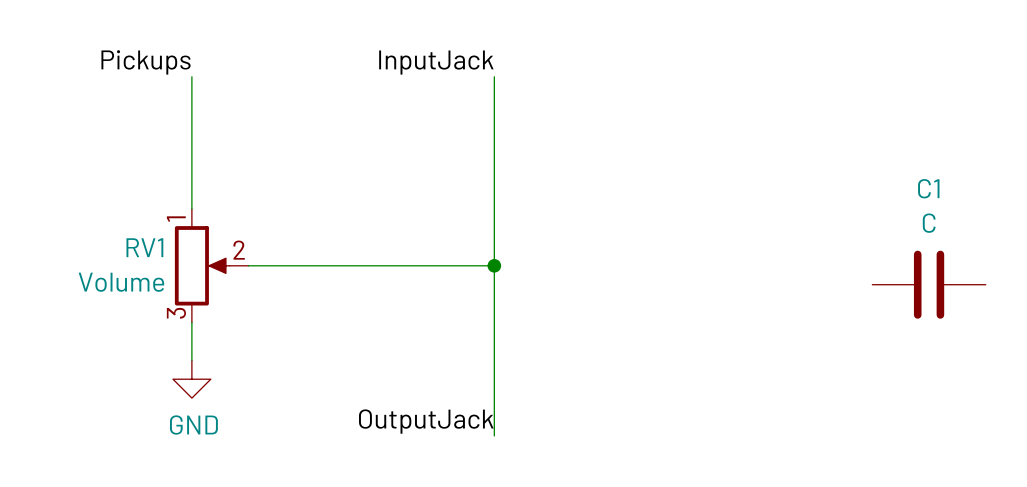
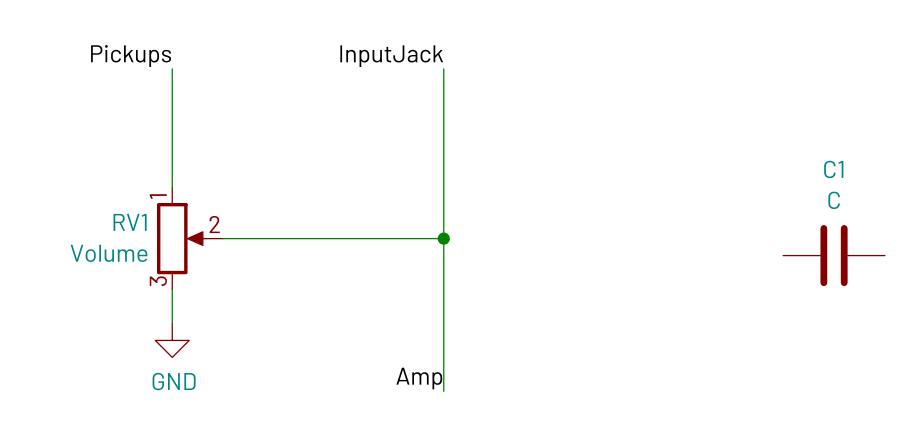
label: OutputJack (426, 421) -> Amp (419, 378)

